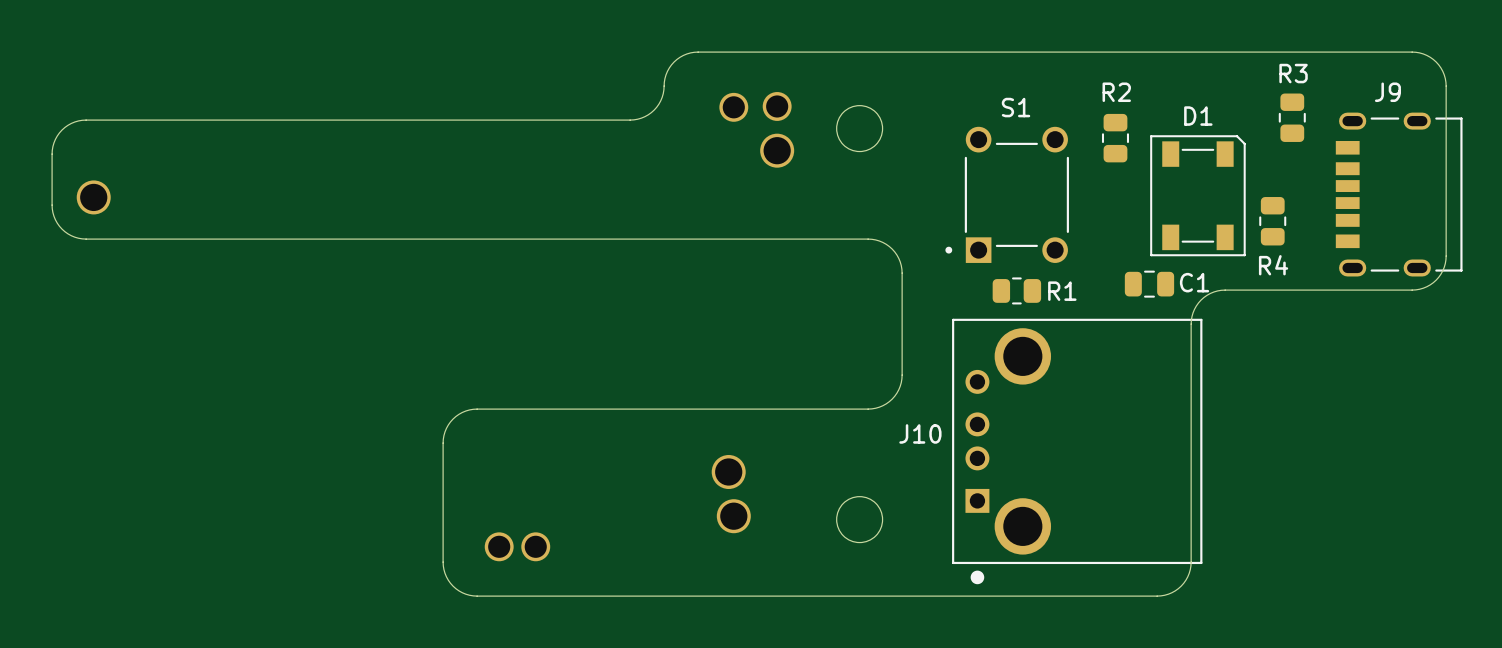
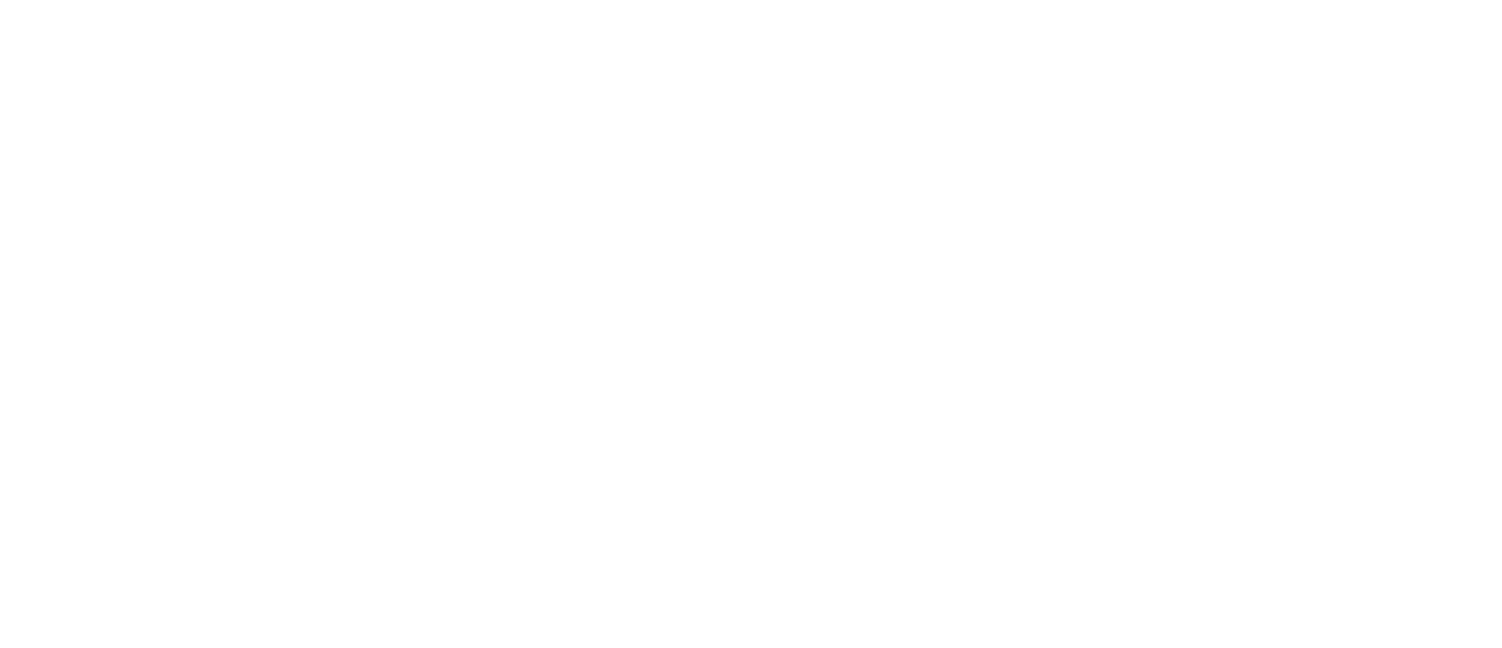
board edge: (698, 52) (1419, 52) (1430, 57) (1438, 64) (1445, 82) (1445, 263) (1436, 280) (1426, 286) (1415, 289) (1221, 290) (1210, 293) (1198, 302) (1193, 312) (1191, 324) (1190, 565) (1183, 583) (1168, 594) (1157, 596) (477, 596) (462, 592) (453, 586) (446, 576) (443, 565) (443, 439) (446, 428) (455, 416) (465, 411) (477, 409) (868, 409) (879, 407) (894, 396) (901, 378) (901, 269) (894, 251) (882, 242) (868, 239) (86, 239) (74, 237) (64, 231) (57, 223) (52, 212) (52, 146) (62, 130) (78, 120) (633, 119) (648, 114) (658, 104) (663, 93) (666, 74) (674, 62) (686, 53) (698, 52) -> none
drawing: [836, 105, 884, 543] -> none
part: (777, 106) -> none
part: (733, 107) -> none
R3: (1292, 117) -> none
R2: (1115, 138) -> none
part: (777, 150) -> none
S1: (1007, 194) -> none
J9: (1399, 194) -> none
D1: (1197, 195) -> none
part: (93, 197) -> none
R4: (1272, 221) -> none
C1: (1149, 284) -> none
R1: (1016, 290) -> none
J10: (1077, 451) -> none
part: (728, 472) -> none
part: (733, 516) -> none
part: (499, 546) -> none
part: (535, 546) -> none

